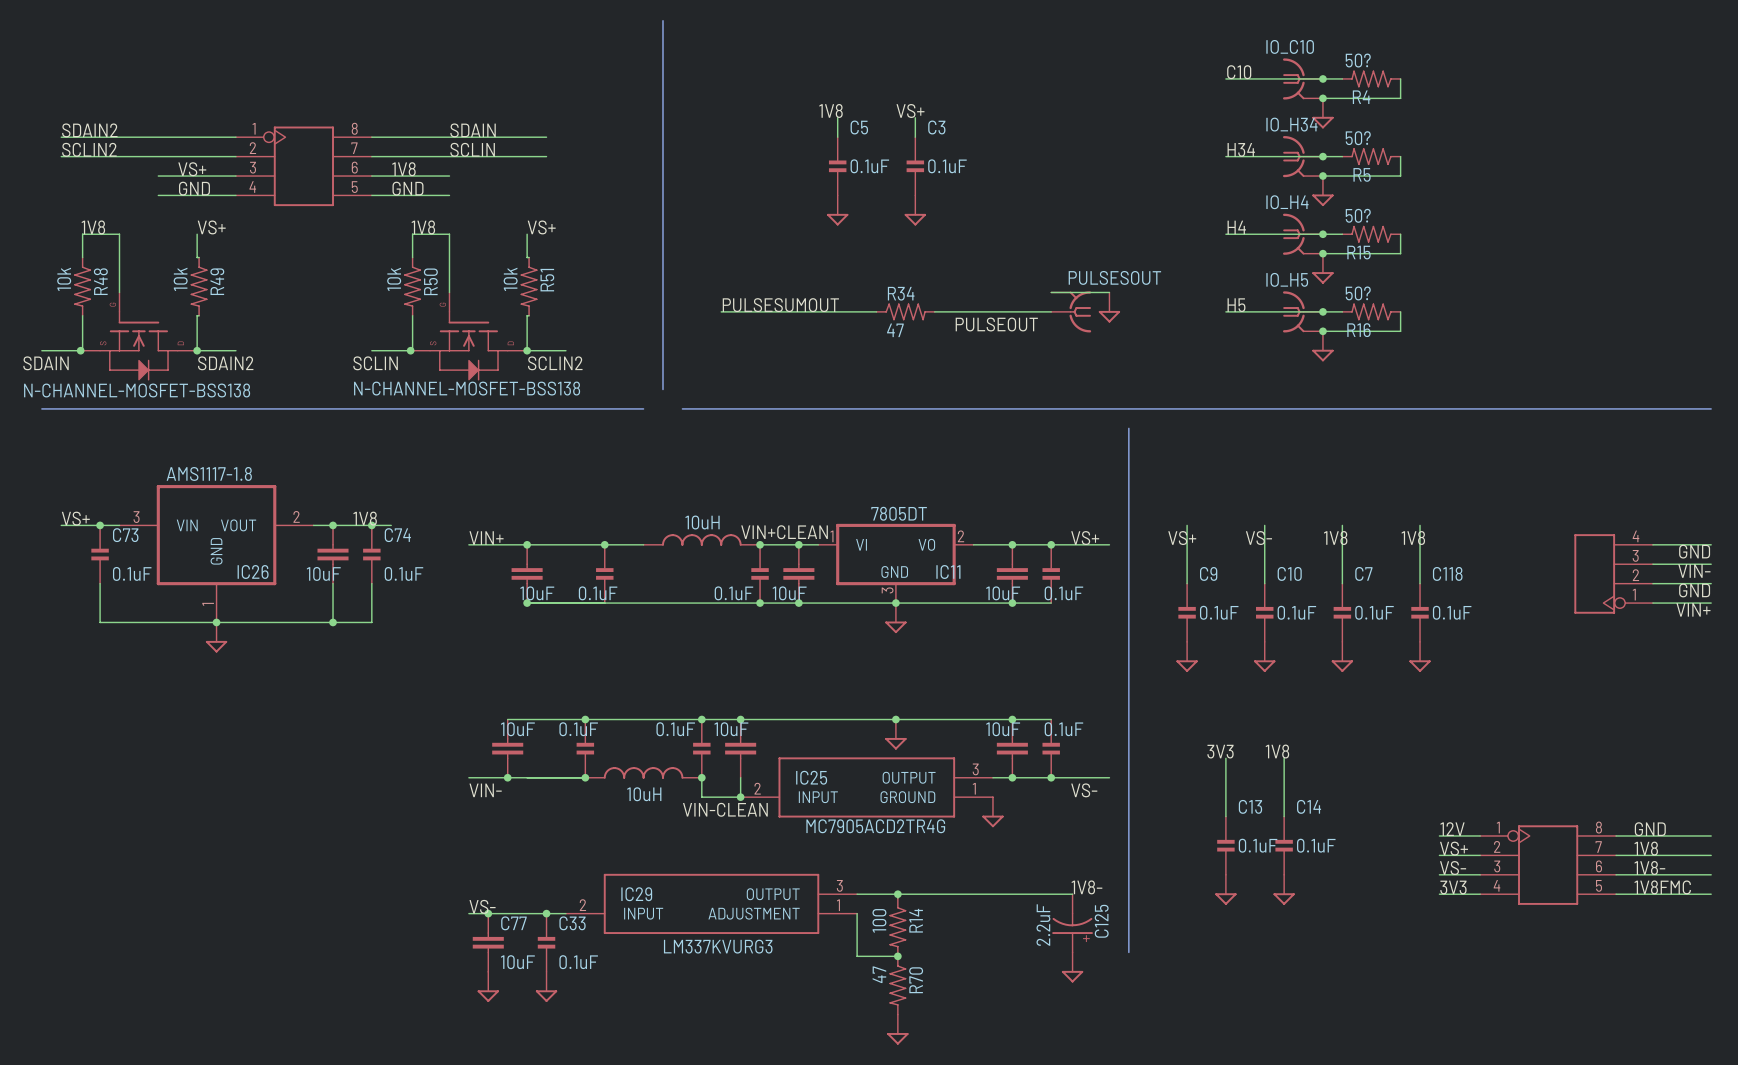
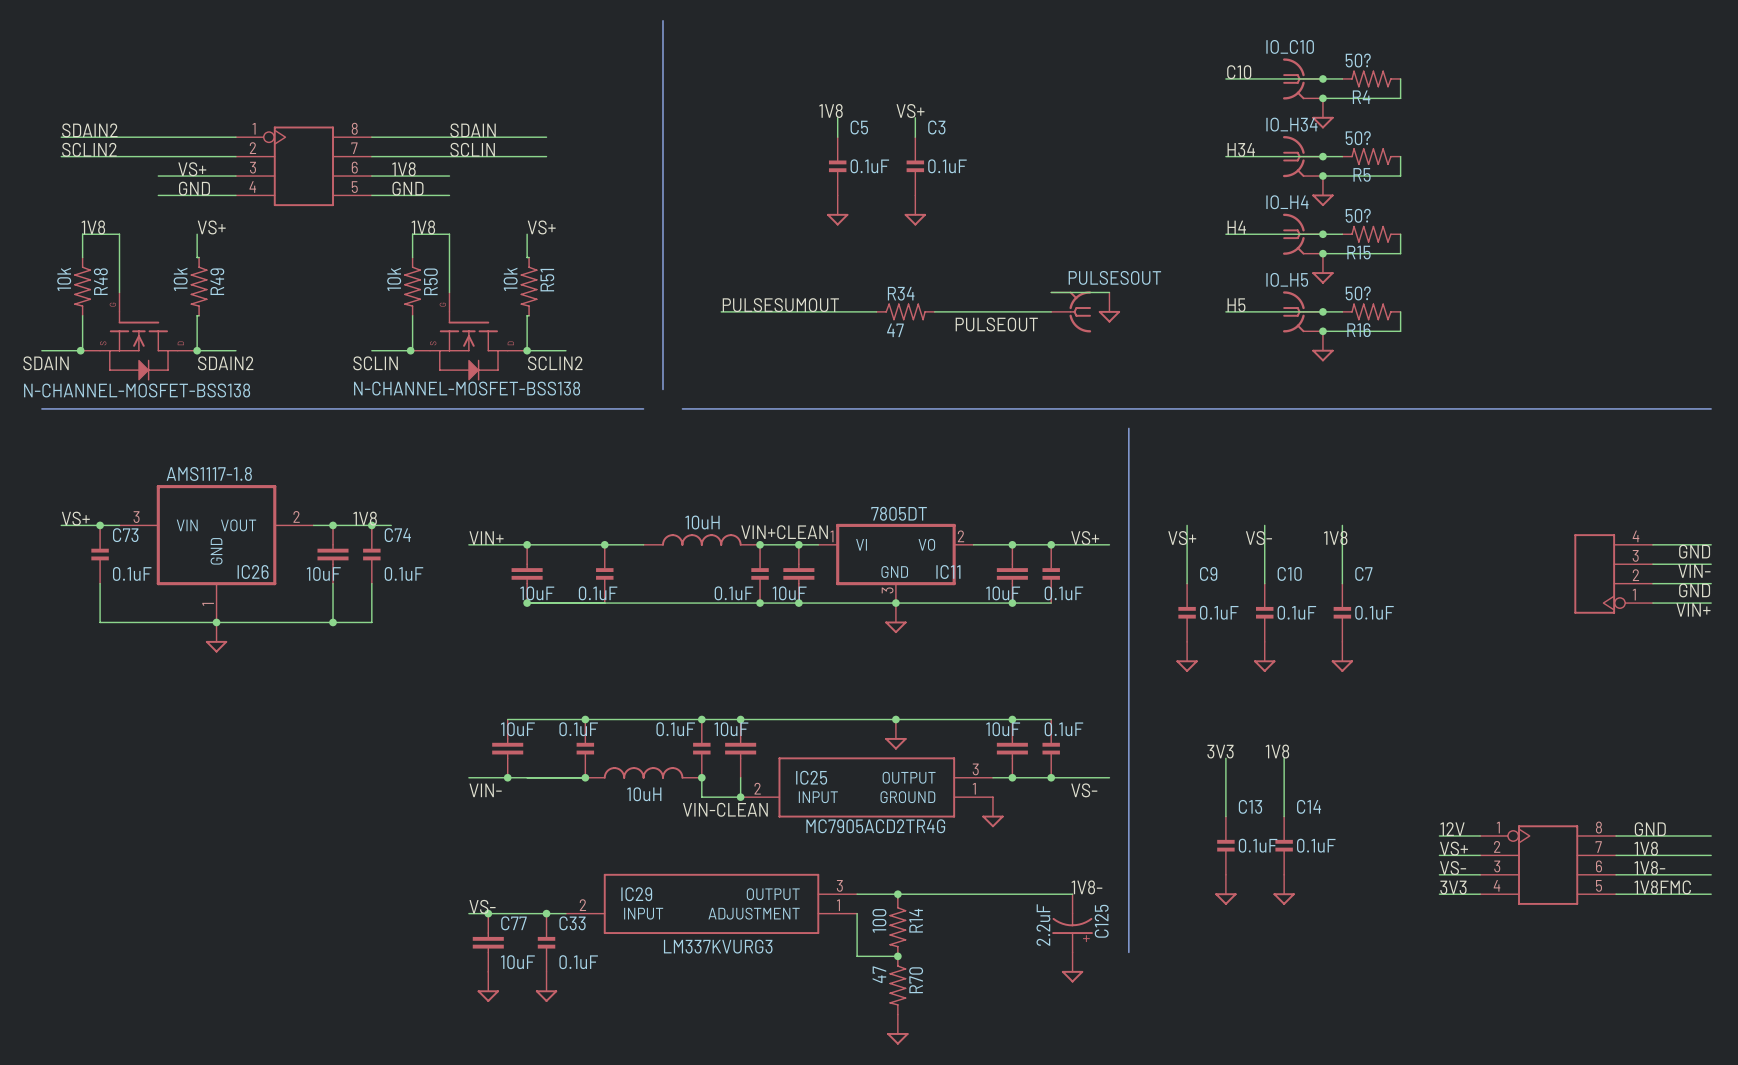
wire: (1420, 525) (1420, 583) -> none
label: 1V8 (1413, 538) -> none
C118: 0.1uF (1420, 612) -> none
power symbol: (1420, 656) -> none

